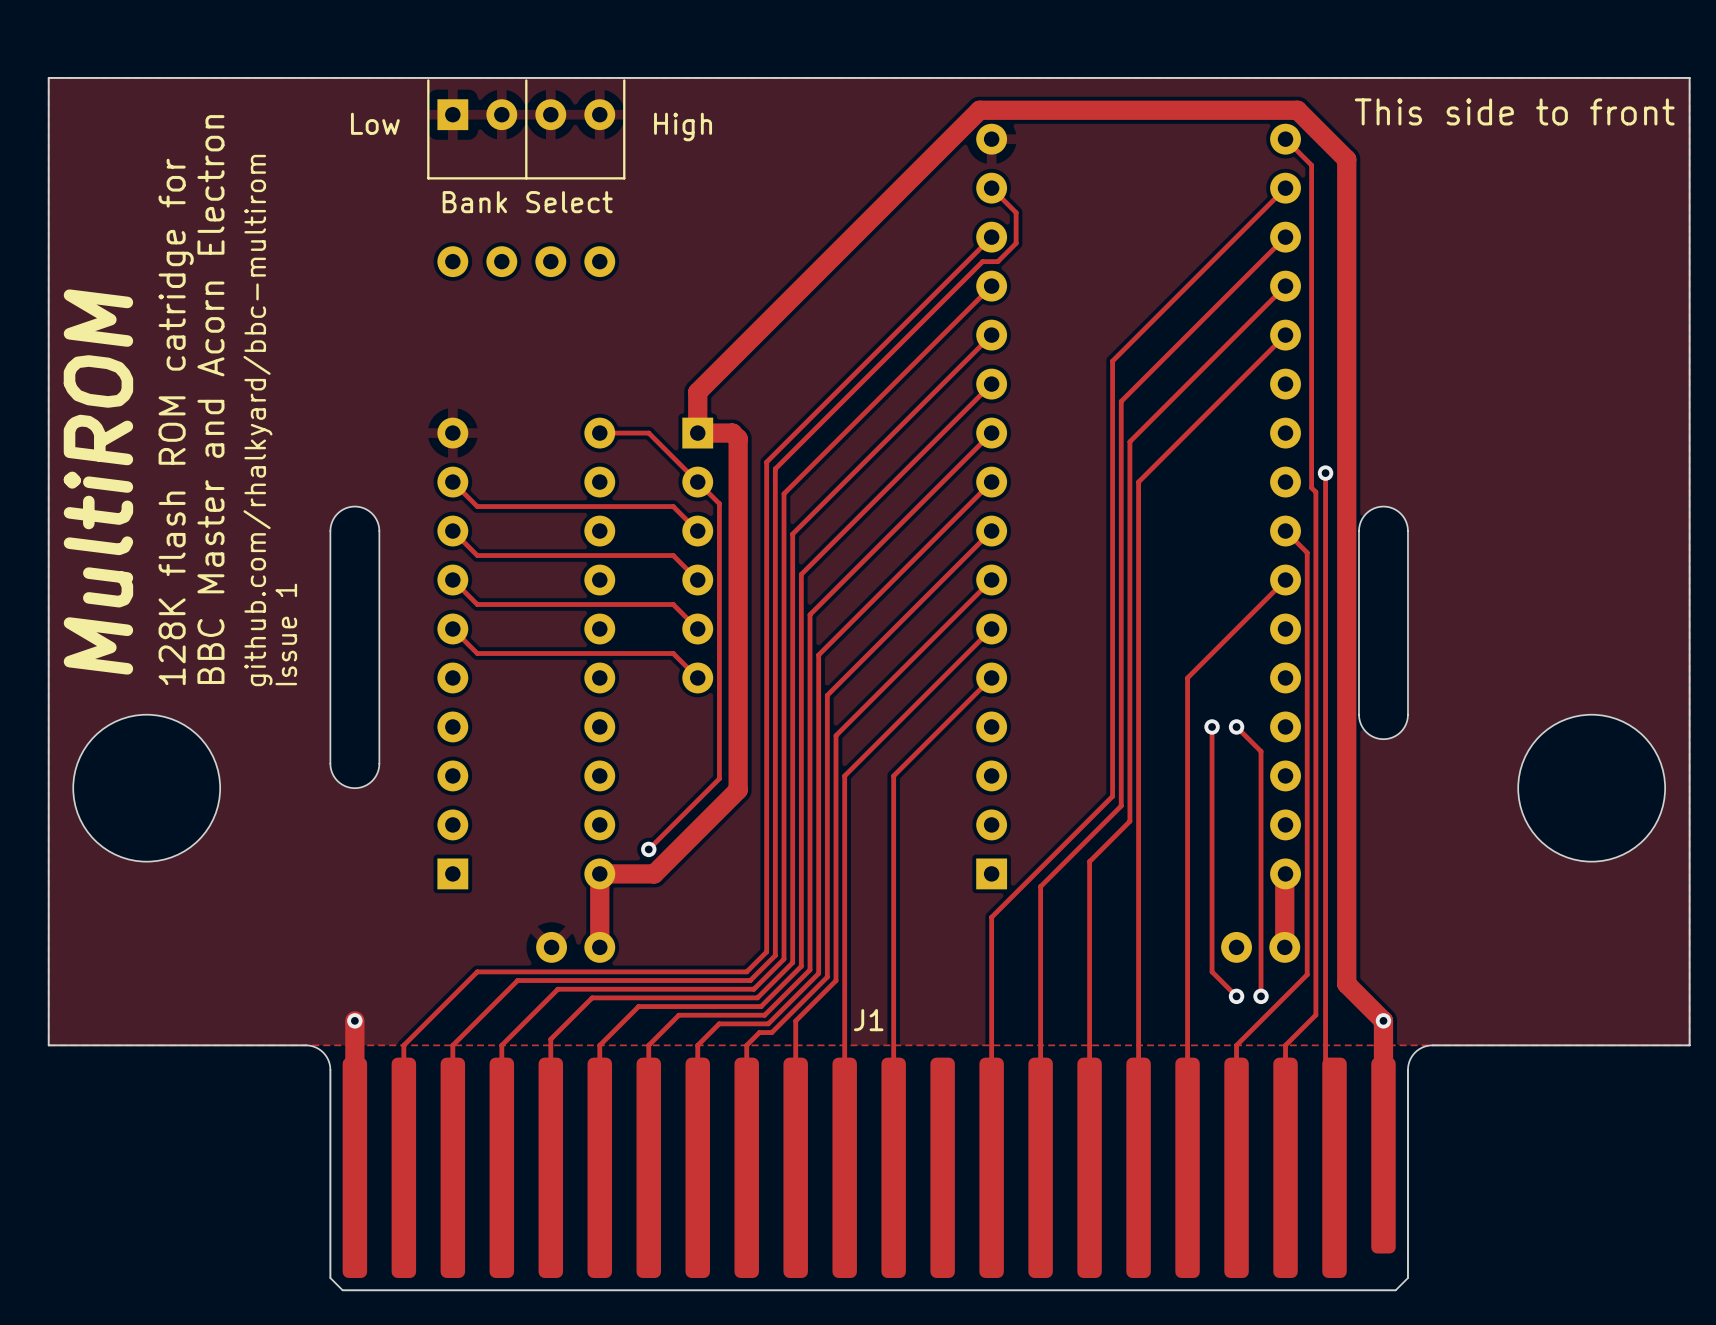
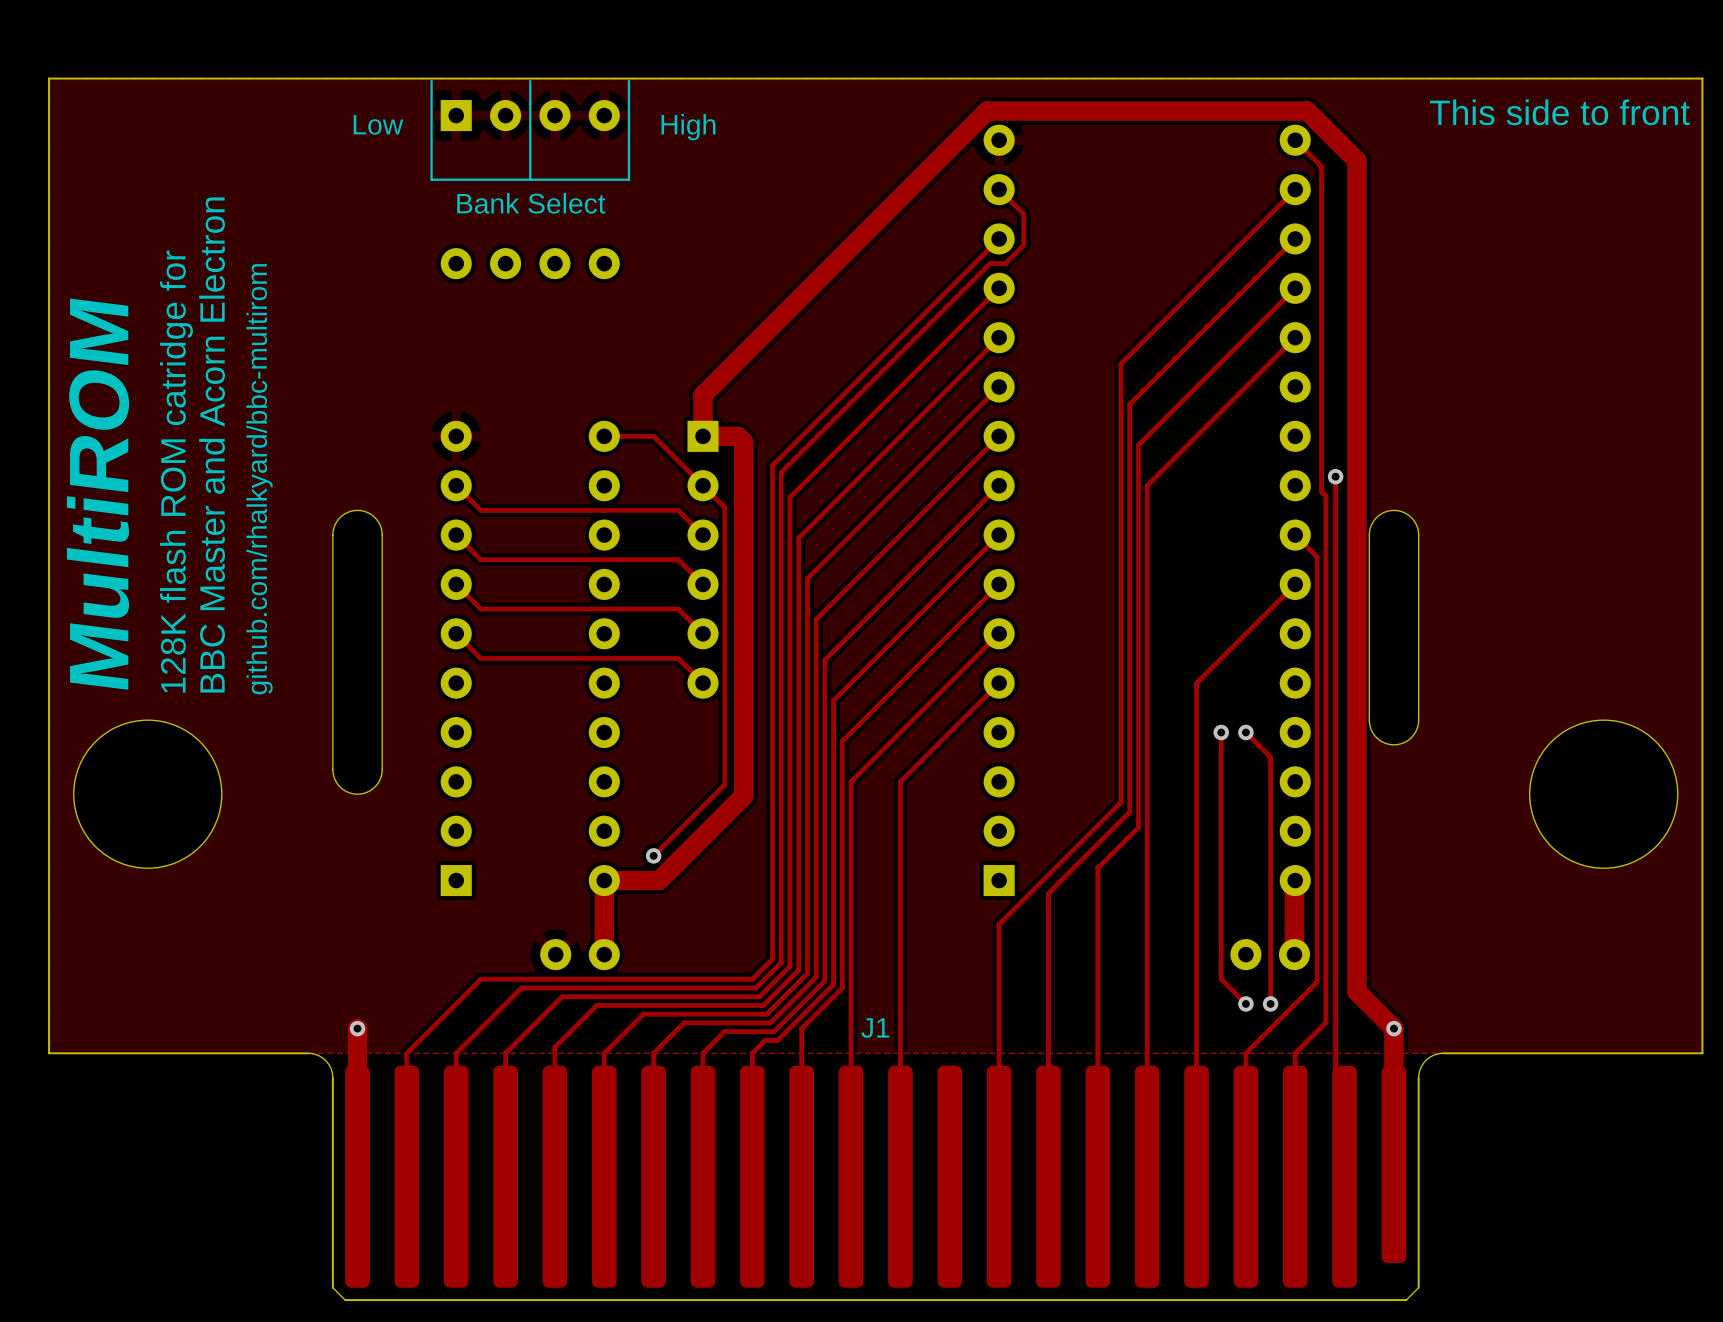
text: Issue 1 (286, 634) -> none

